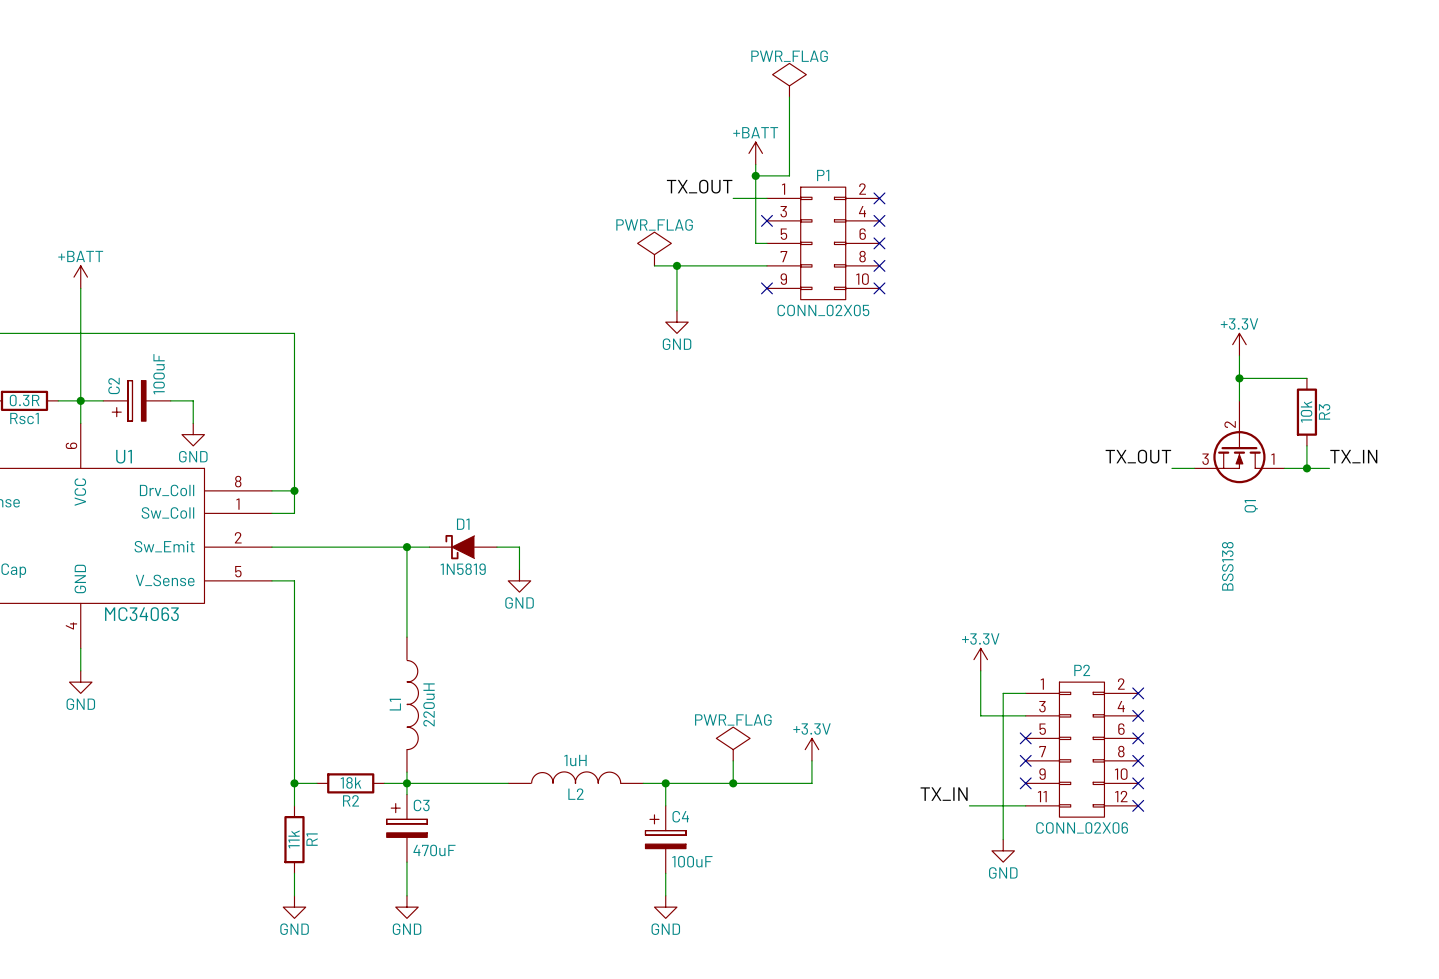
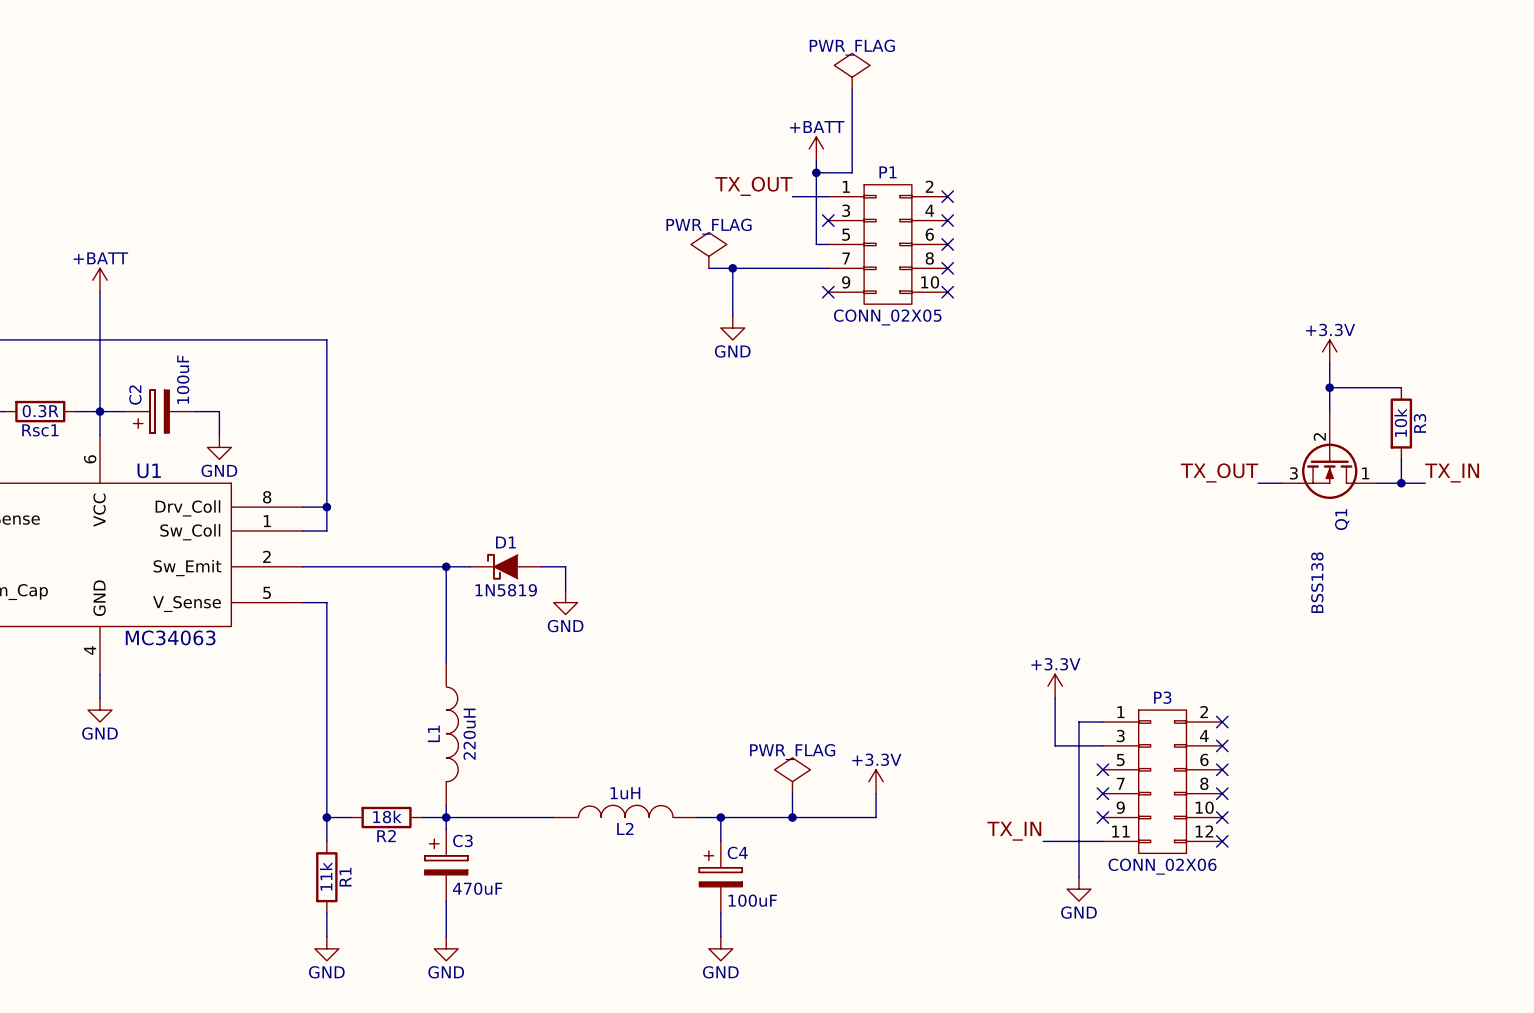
P2 name: P2 (1082, 670) -> P3 (1162, 697)

